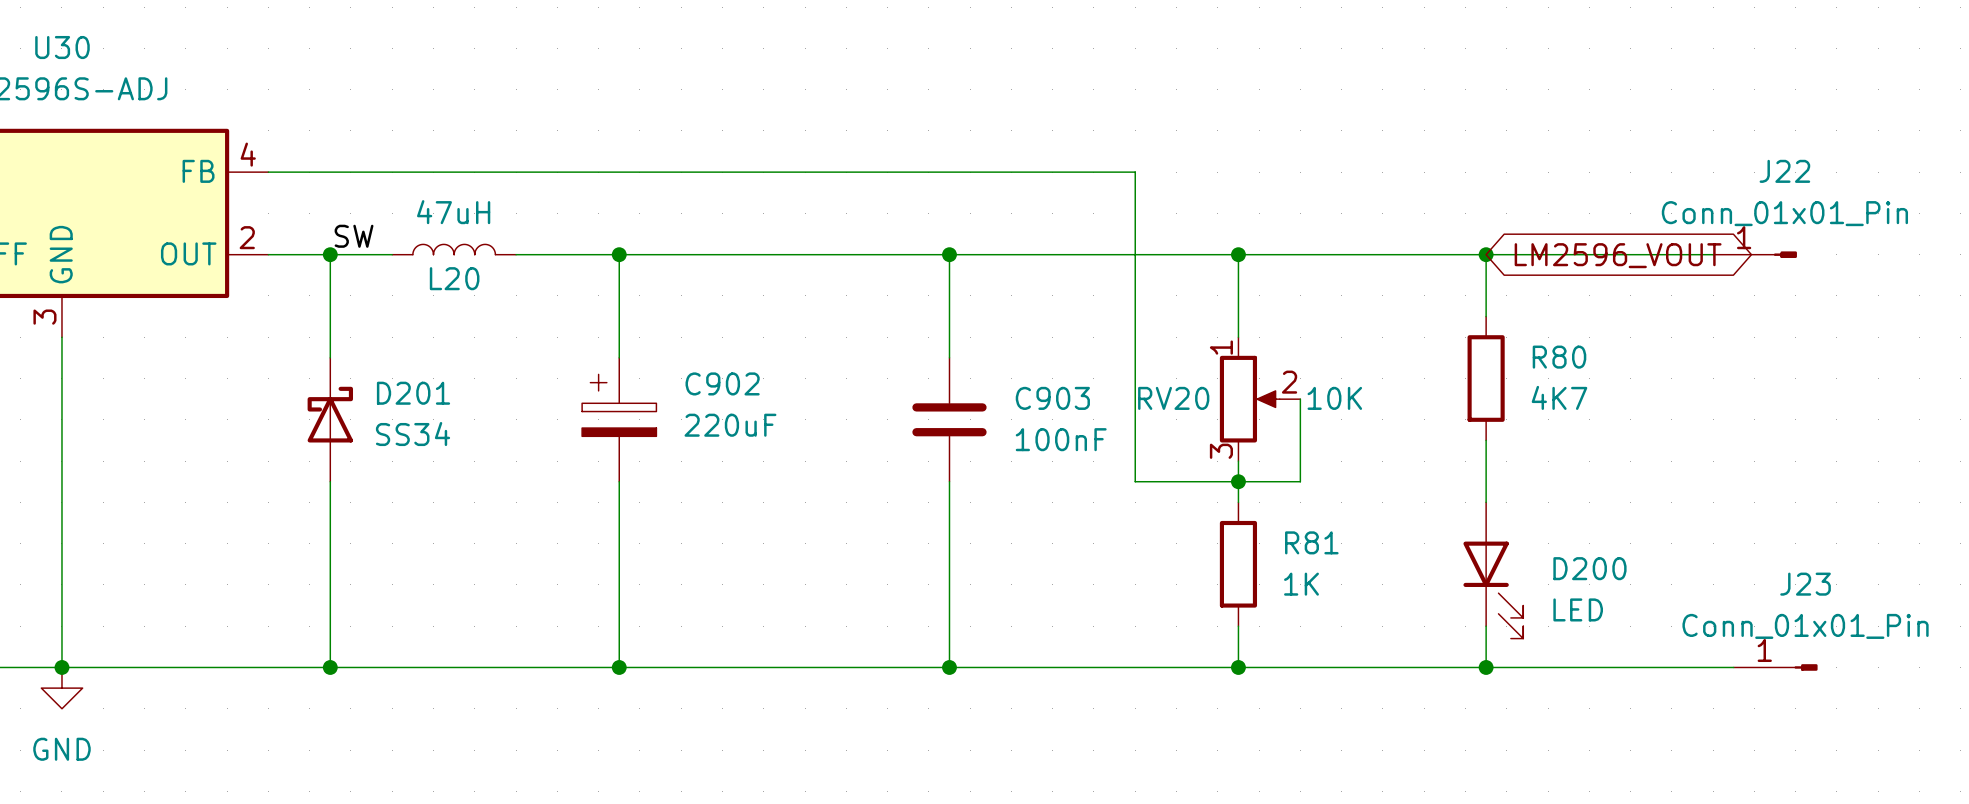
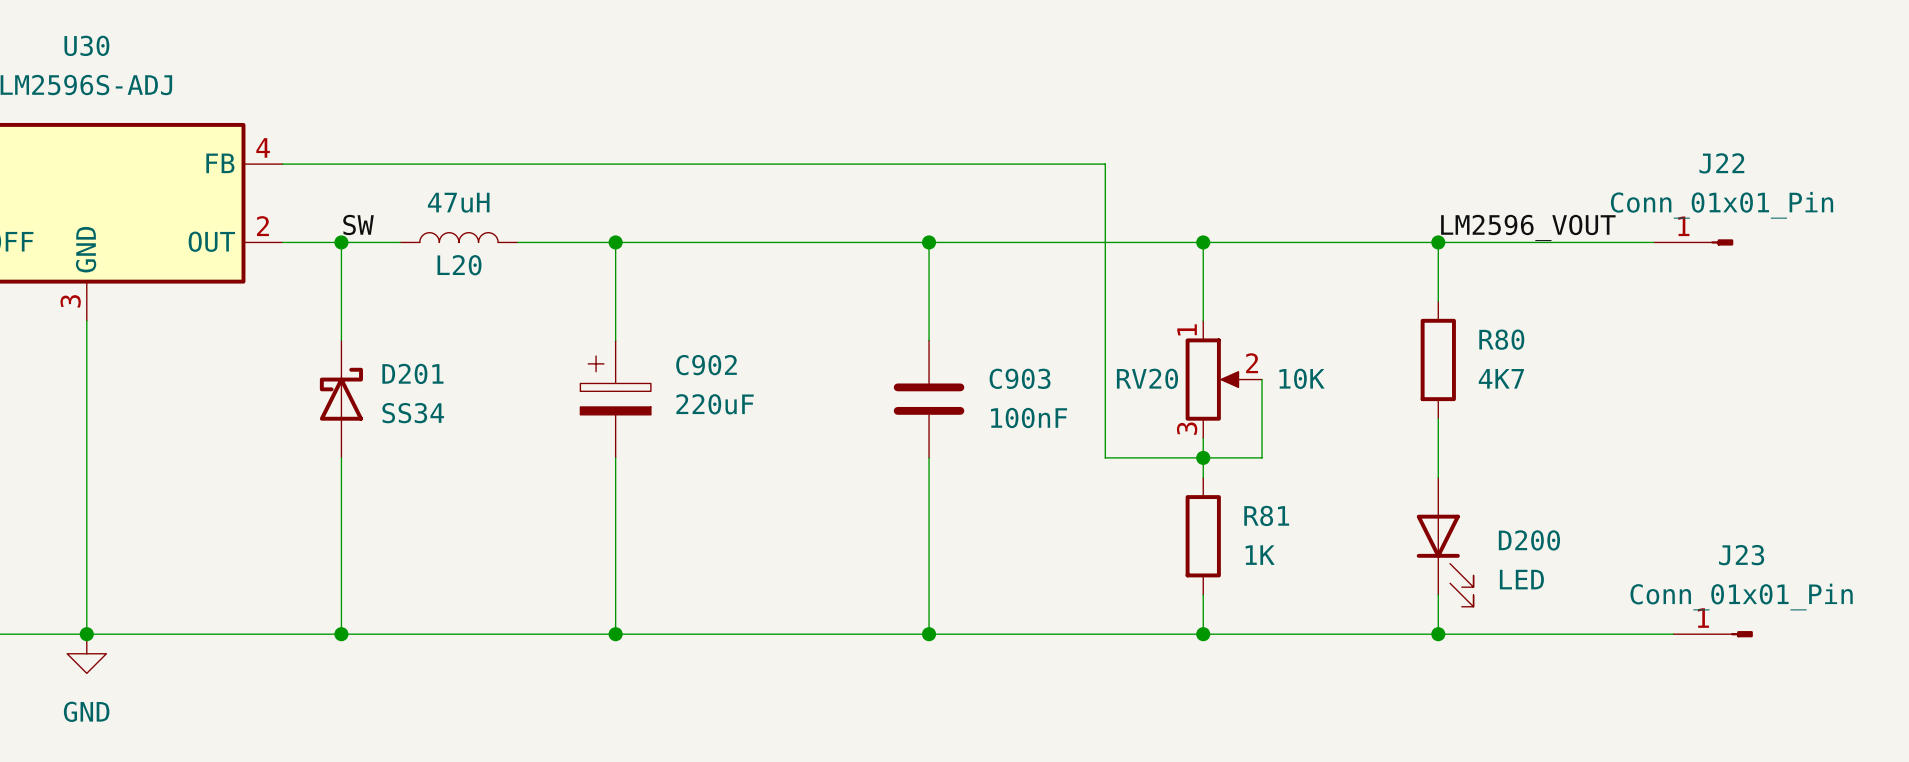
label: none -> LM2596_VOUT (1528, 227)
global label: LM2596_VOUT (1618, 255) -> none

